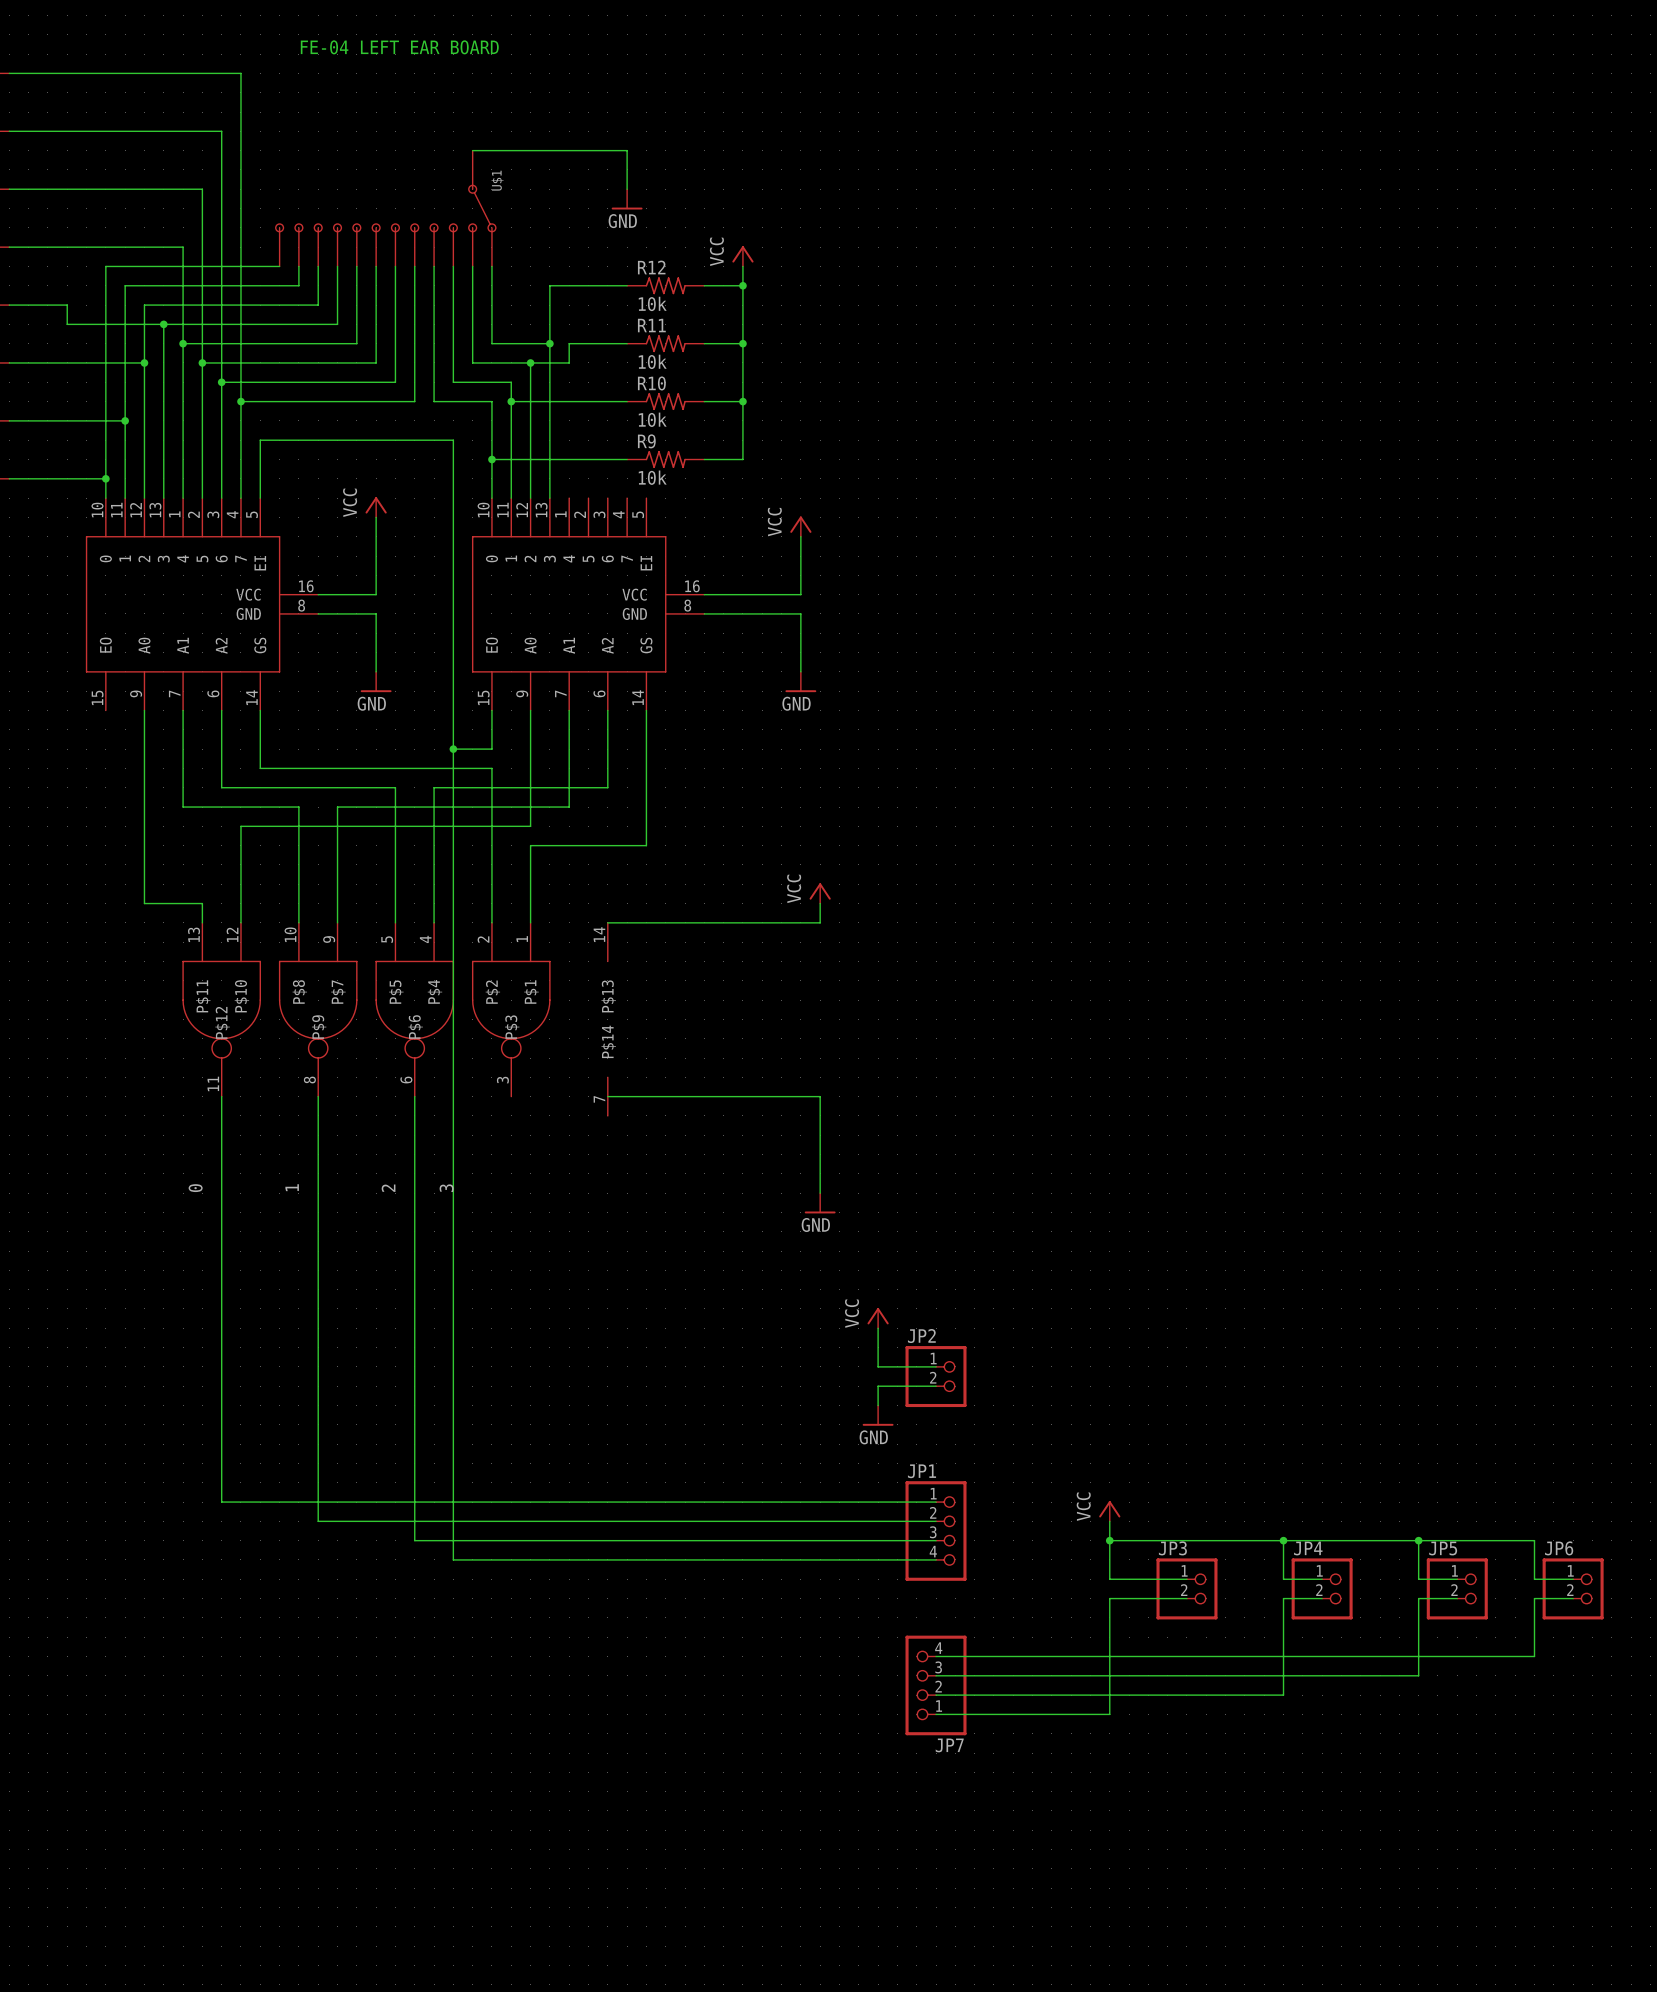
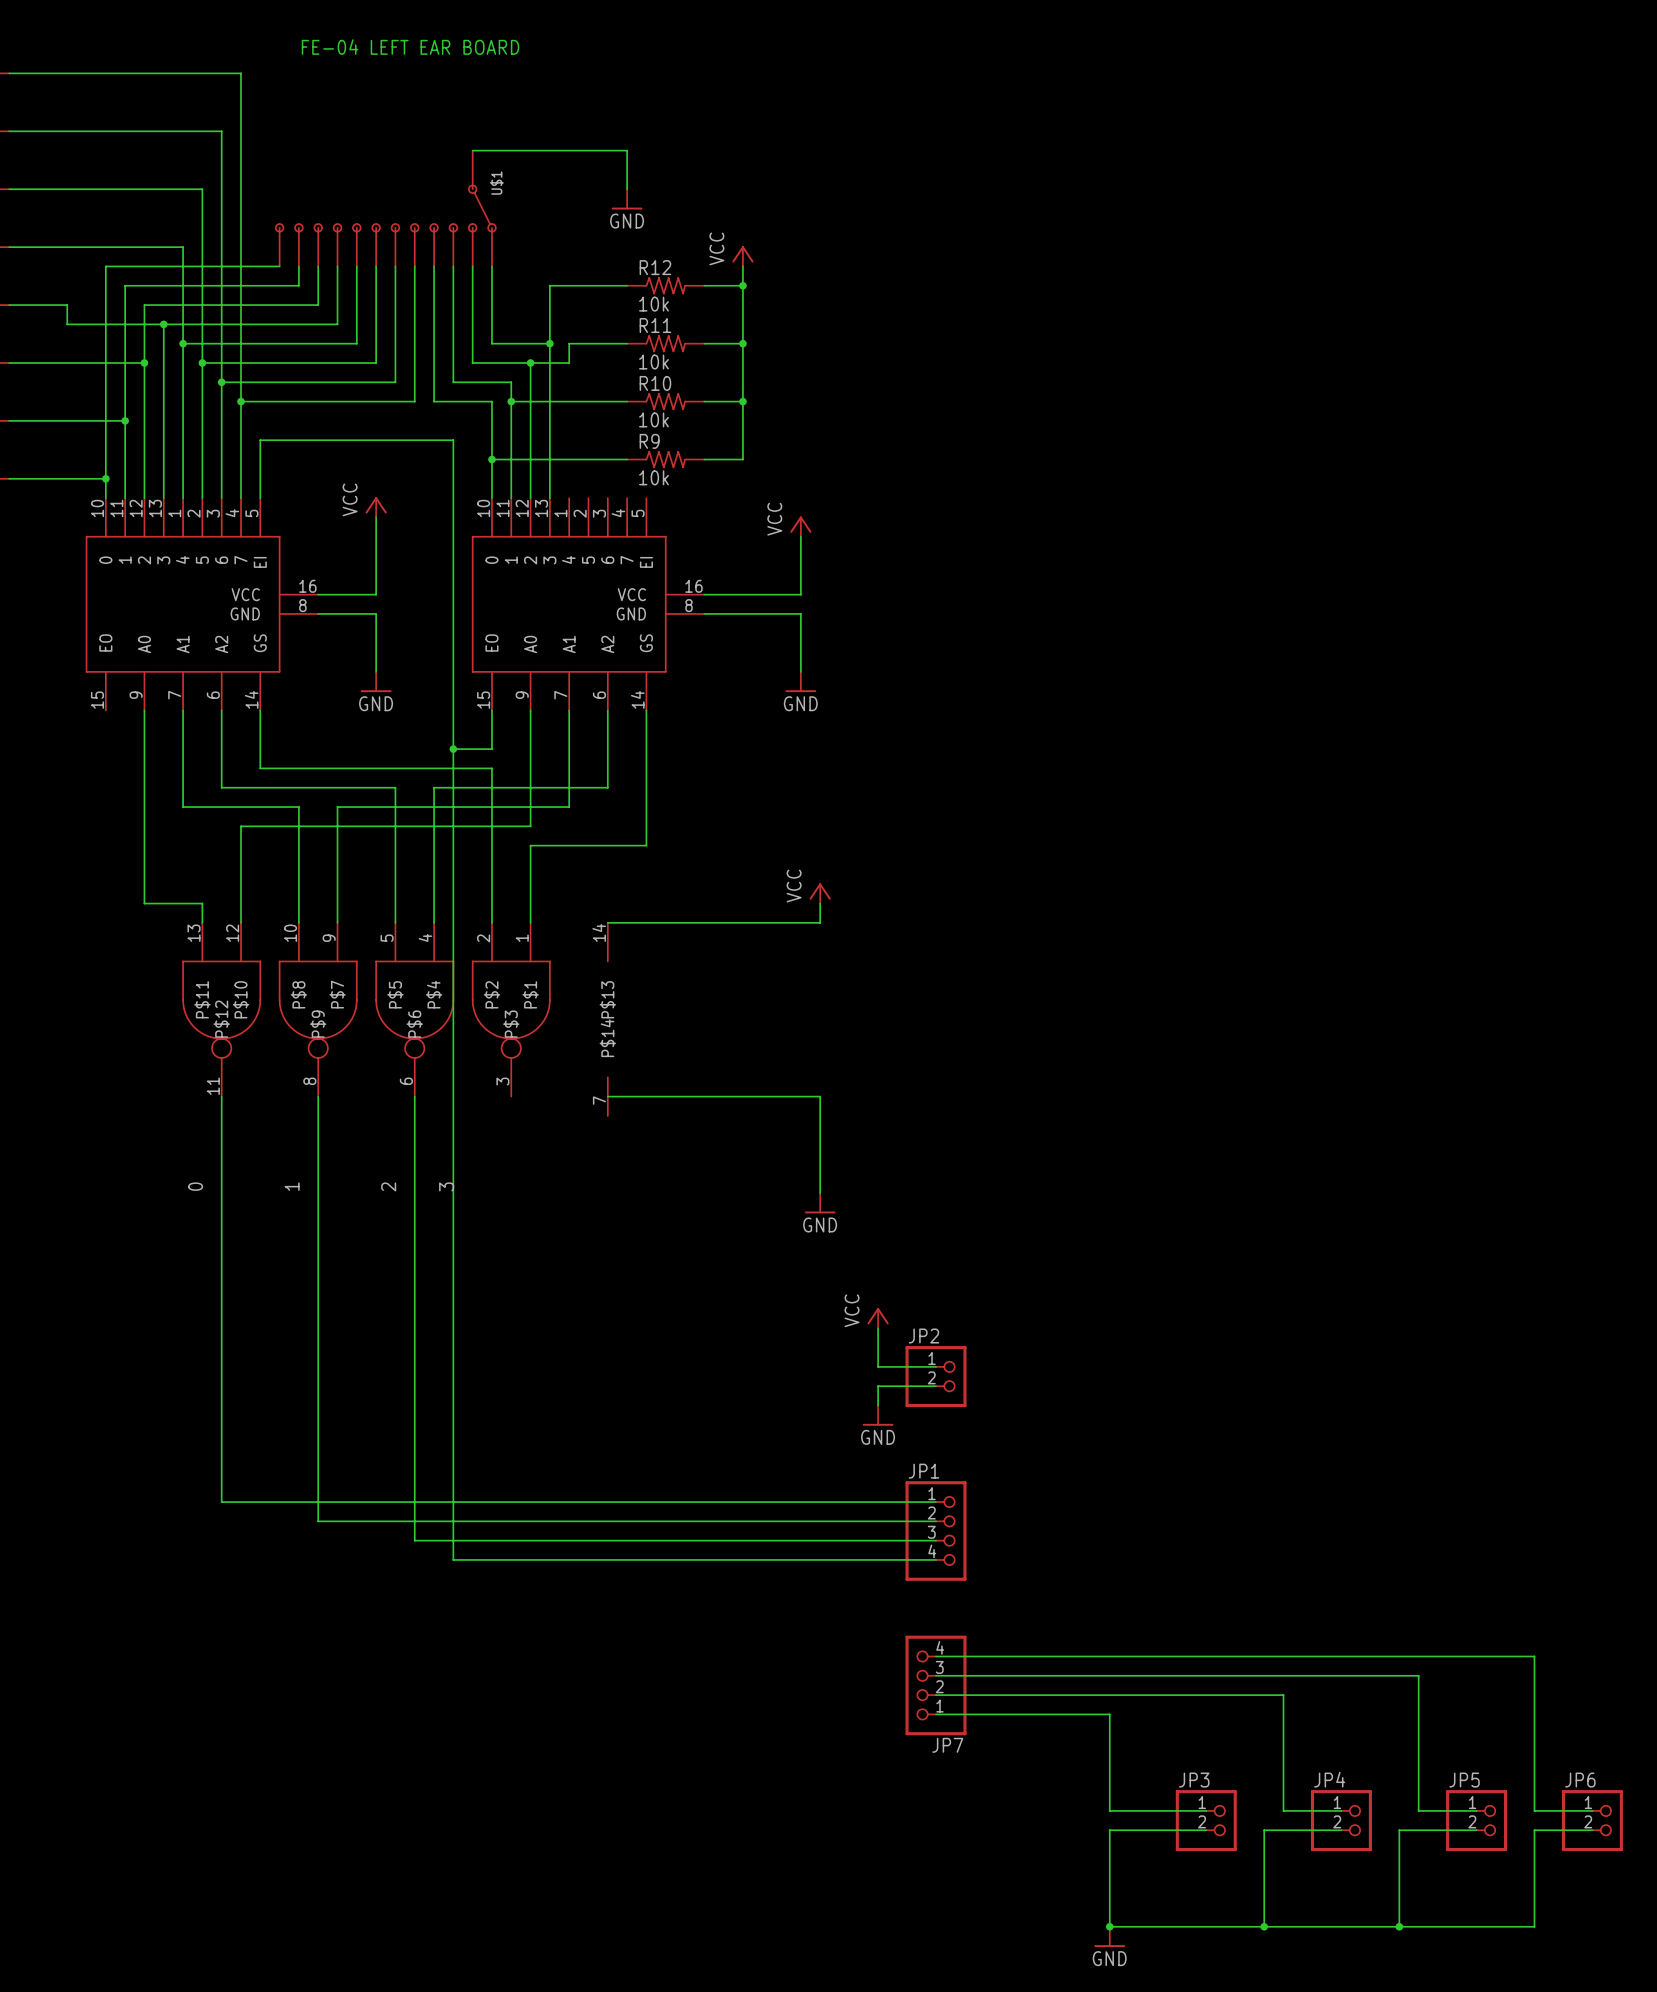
power symbol: VCC (1109, 1511) -> none
wire: (1109, 1521) (1109, 1579) (1186, 1579) -> none
wire: (1109, 1540) (1534, 1540) (1534, 1579) (1573, 1579) -> none
junction: (1109, 1540) -> none
wire: (1283, 1540) (1283, 1579) (1322, 1579) -> none
junction: (1283, 1540) -> none
wire: (1418, 1540) (1418, 1579) (1457, 1579) -> none
junction: (1418, 1540) -> none
JP3 position: (1186, 1588) -> (1206, 1820)
JP4 position: (1322, 1588) -> (1341, 1820)
JP5 position: (1457, 1588) -> (1476, 1820)
JP6 position: (1573, 1588) -> (1592, 1820)
wire: (1186, 1598) (1109, 1598) (1109, 1714) -> (1206, 1810) (1109, 1810) (1109, 1714)
wire: (1322, 1598) (1283, 1598) (1283, 1695) -> (1341, 1810) (1283, 1810) (1283, 1695)
wire: (1457, 1598) (1418, 1598) (1418, 1675) -> (1476, 1810) (1418, 1810) (1418, 1675)
wire: (1573, 1598) (1534, 1598) (1534, 1656) -> (1592, 1810) (1534, 1810) (1534, 1656)
wire: none -> (1206, 1830) (1109, 1830) (1109, 1926) (1534, 1926) (1534, 1830) (1592, 1830)
wire: none -> (1341, 1830) (1264, 1830) (1264, 1926)
wire: none -> (1476, 1830) (1399, 1830) (1399, 1926)
junction: none -> (1109, 1926)
junction: none -> (1264, 1926)
junction: none -> (1399, 1926)
power symbol: none -> GND (1109, 1936)

